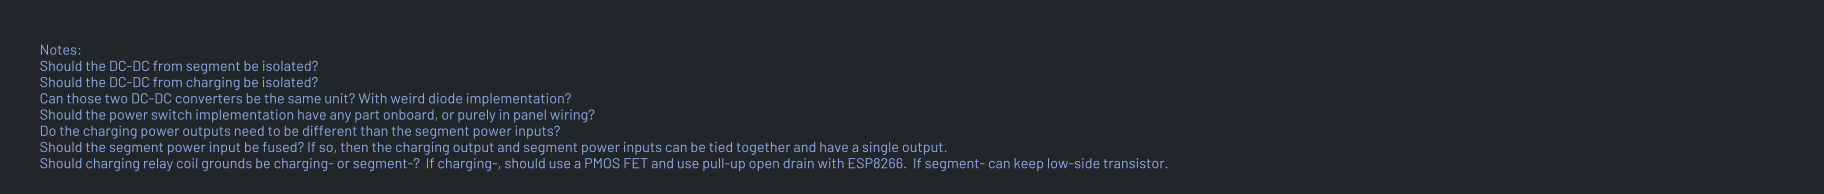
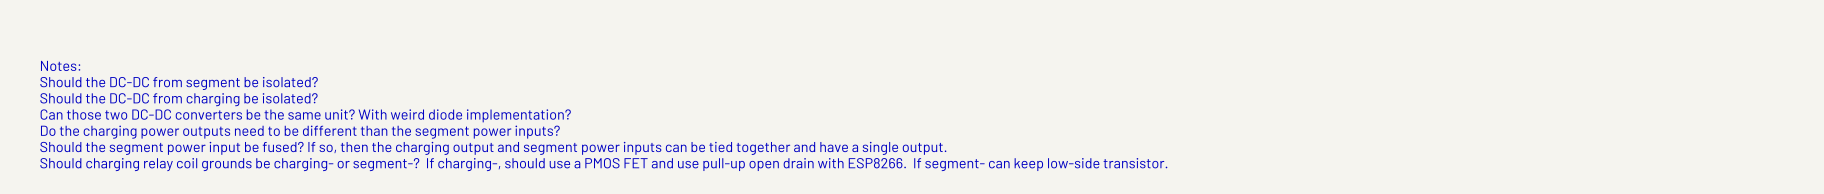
text: Notes: (60, 49) -> none
text: Should the DC-DC from segment be isolated? (179, 67) -> Notes: (60, 65)
text: Should the DC-DC from charging be isolated? (178, 83) -> Should the DC-DC from segment be isolated? (179, 83)
text: Can those two DC-DC converters be the same unit? With weird diode implementation? (305, 99) -> Should the DC-DC from charging be isolated? (178, 99)
text: Should the power switch implementation have any part onboard, or purely in panel wiring? (317, 115) -> Can those two DC-DC converters be the same unit? With weird diode implementation? (305, 115)

